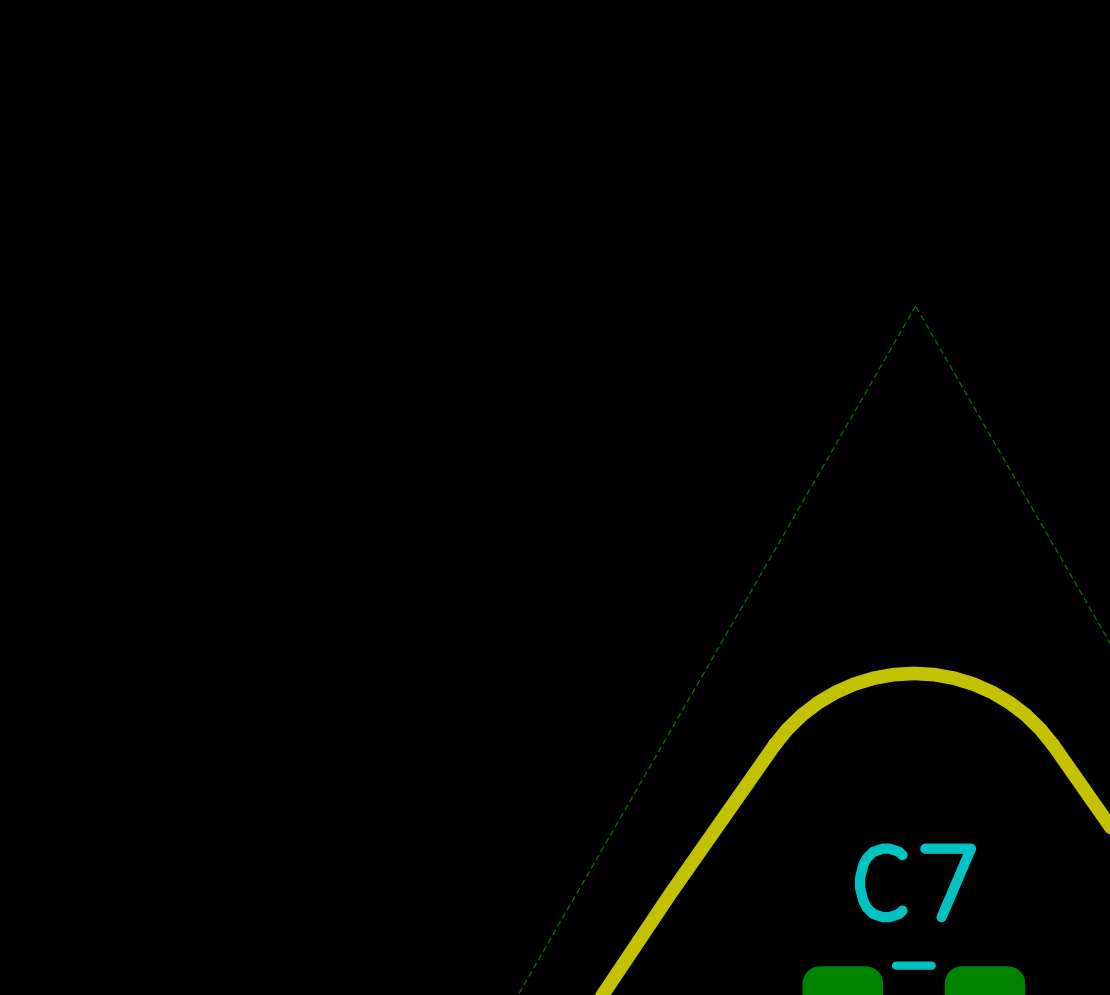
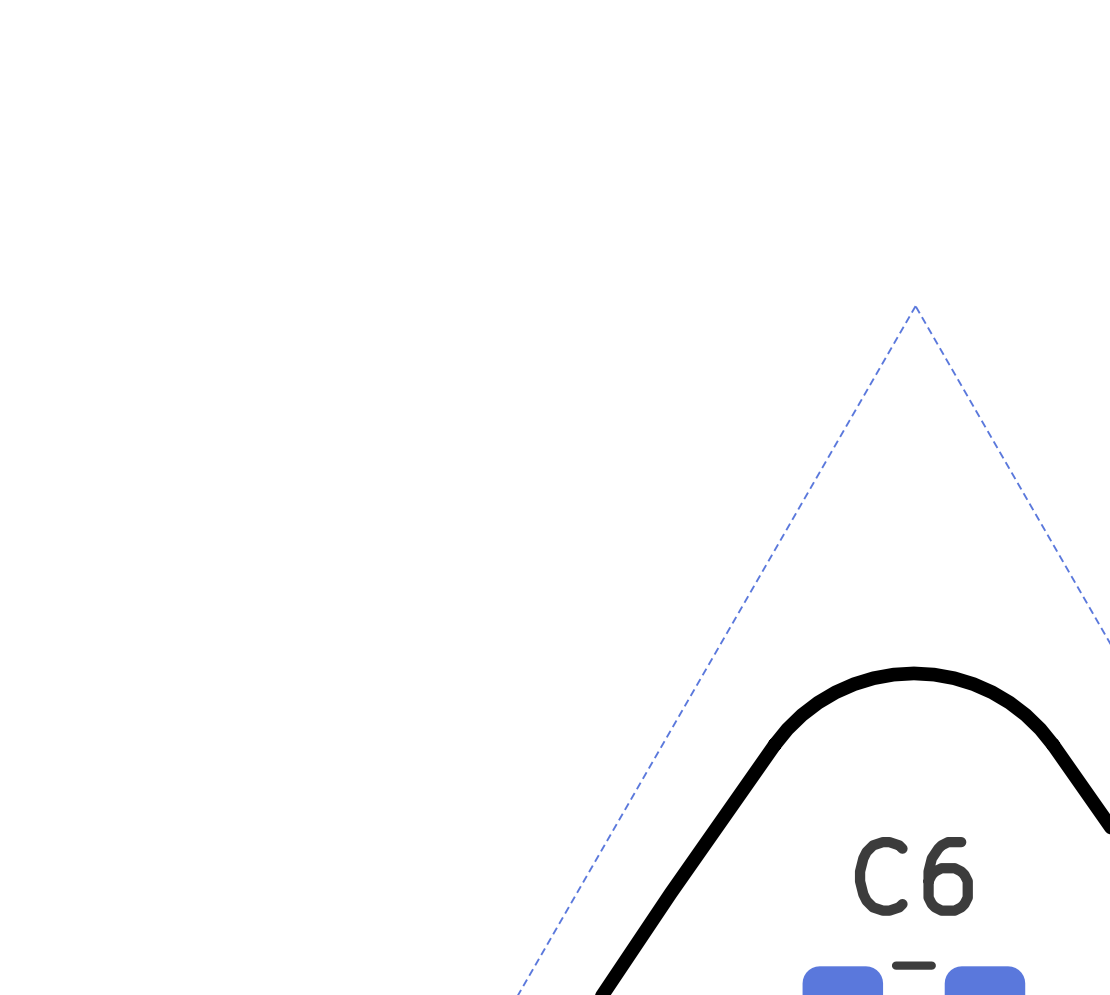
C7 name: C7 (915, 882) -> C6 (913, 876)

